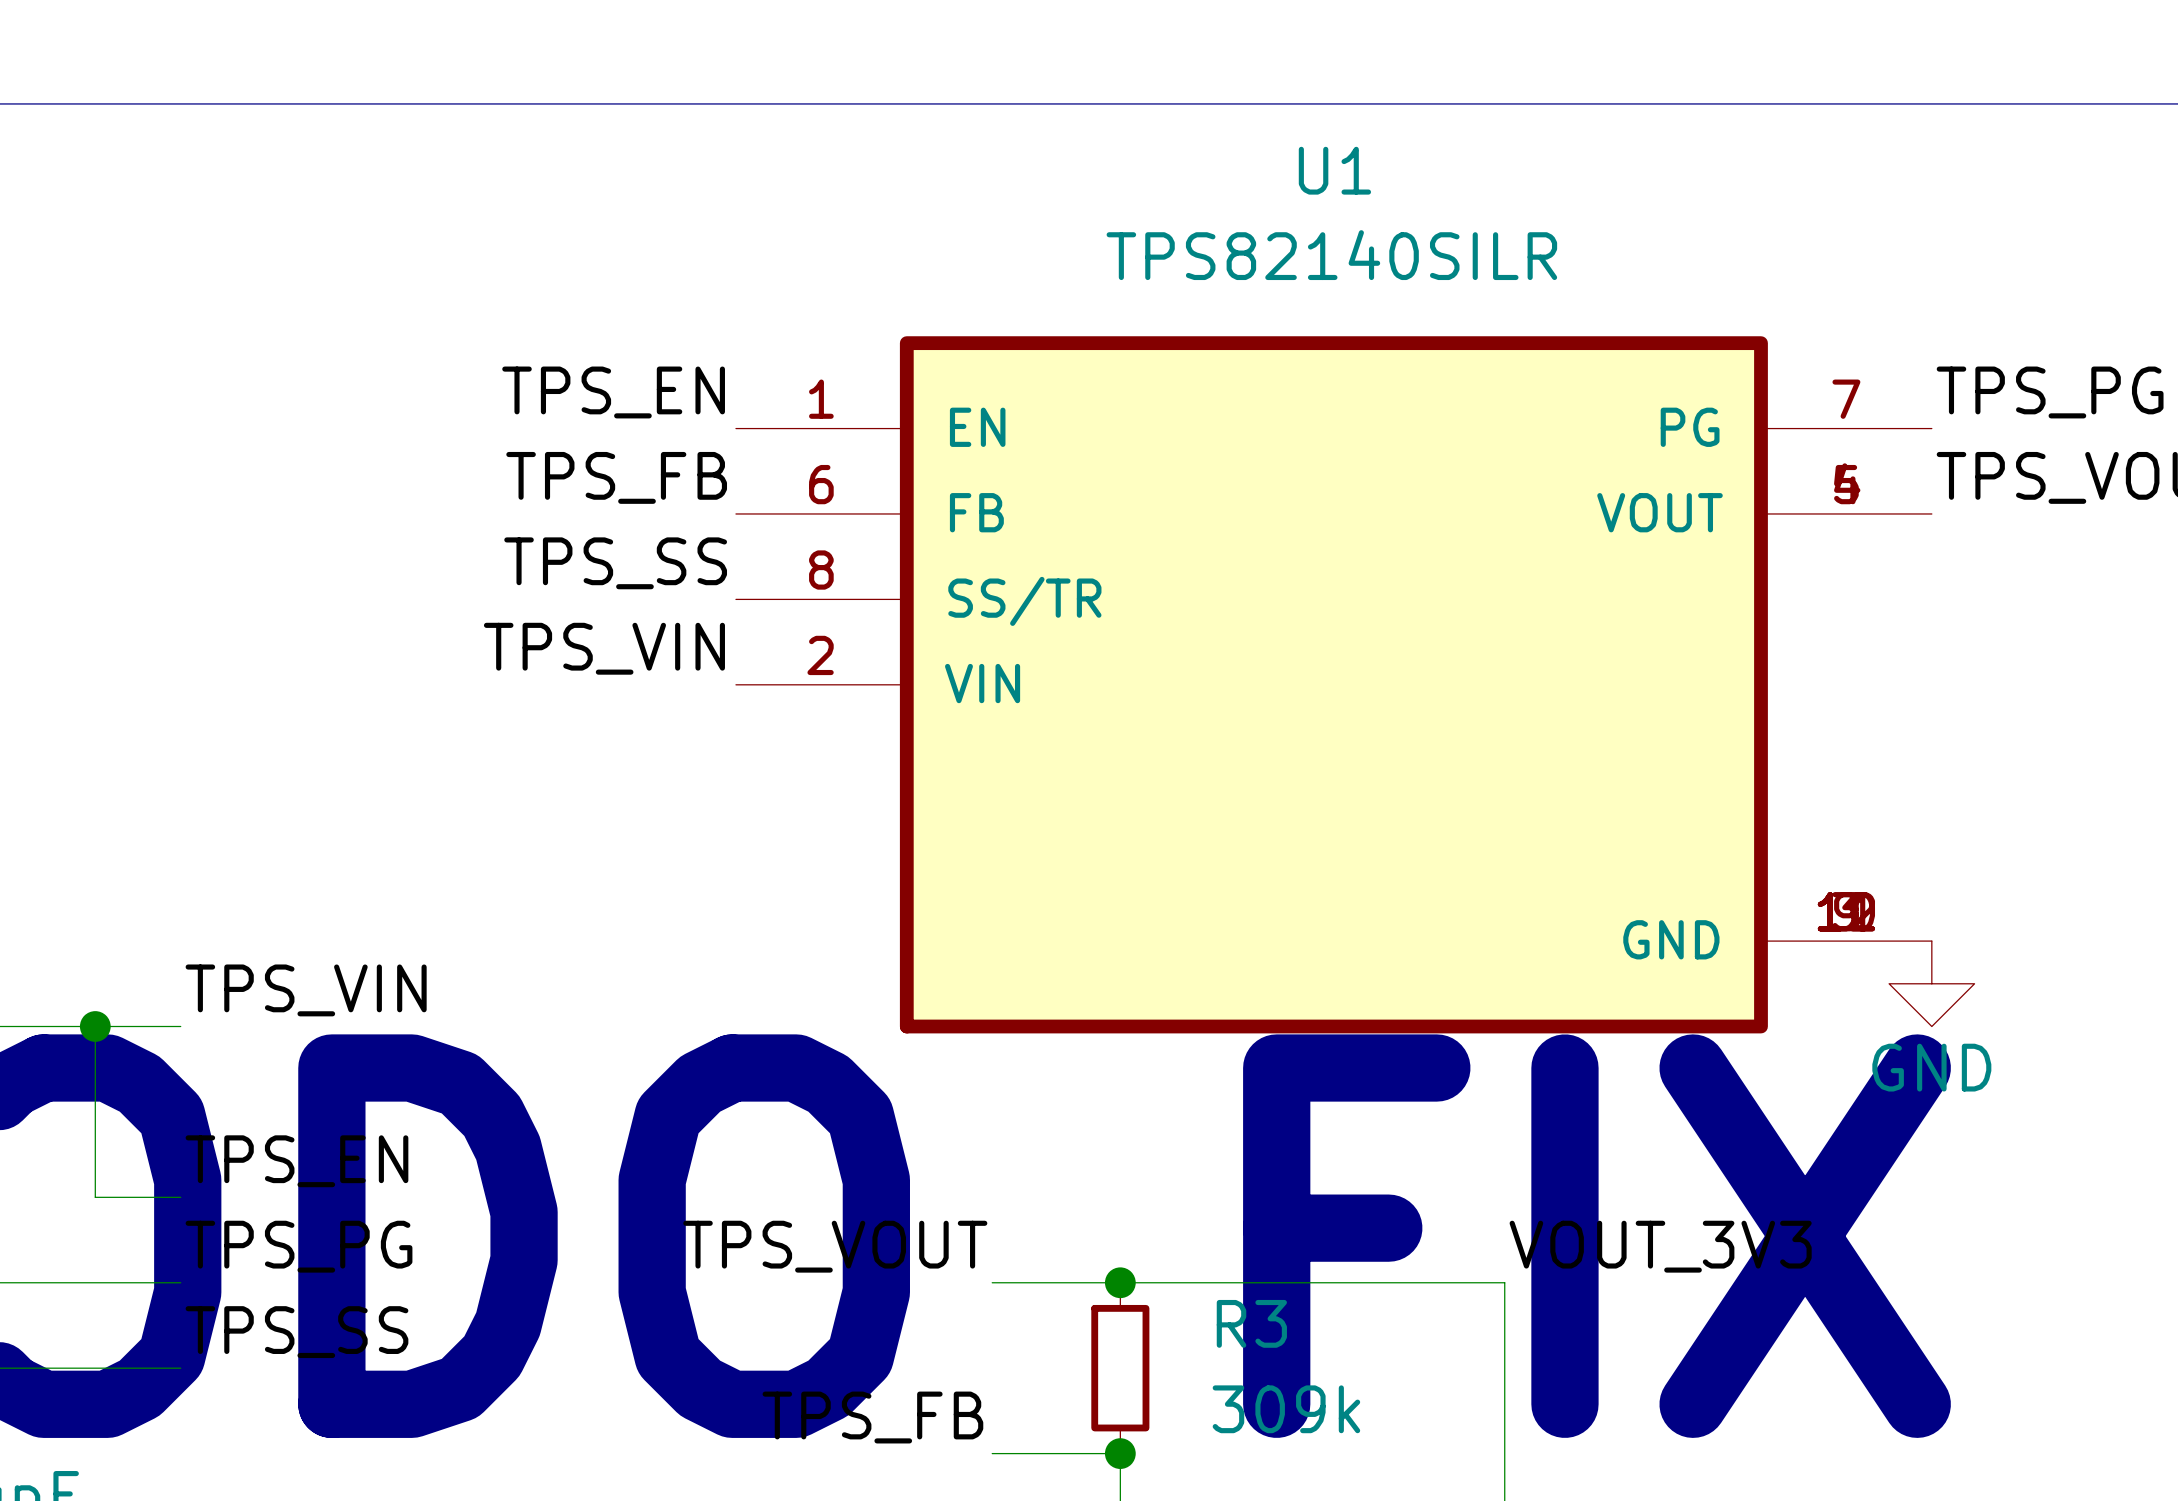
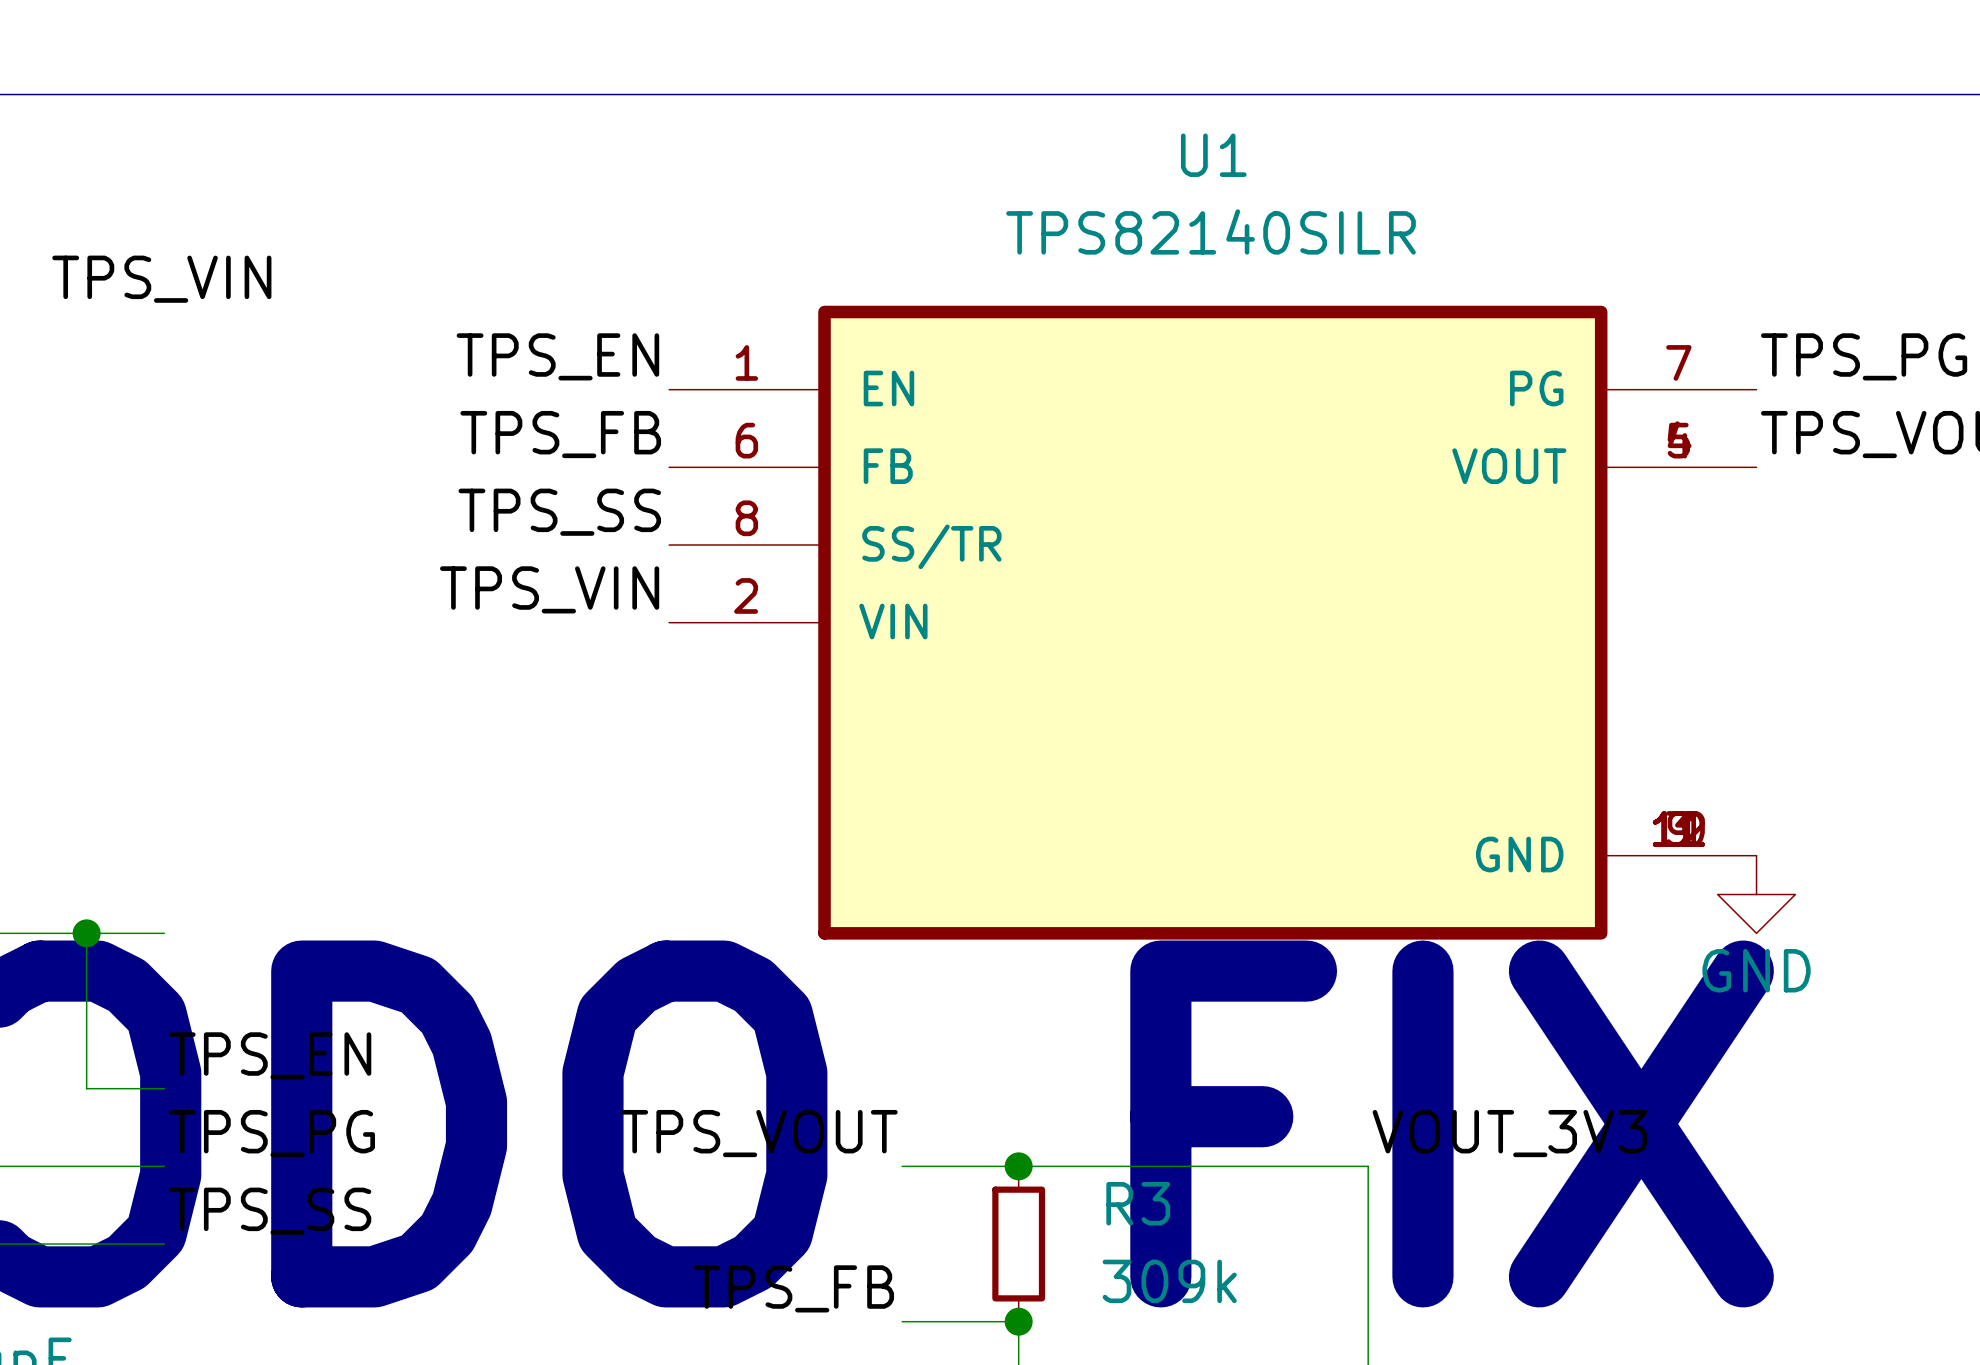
label position: TPS_VIN (306, 990) -> TPS_VIN (161, 279)

